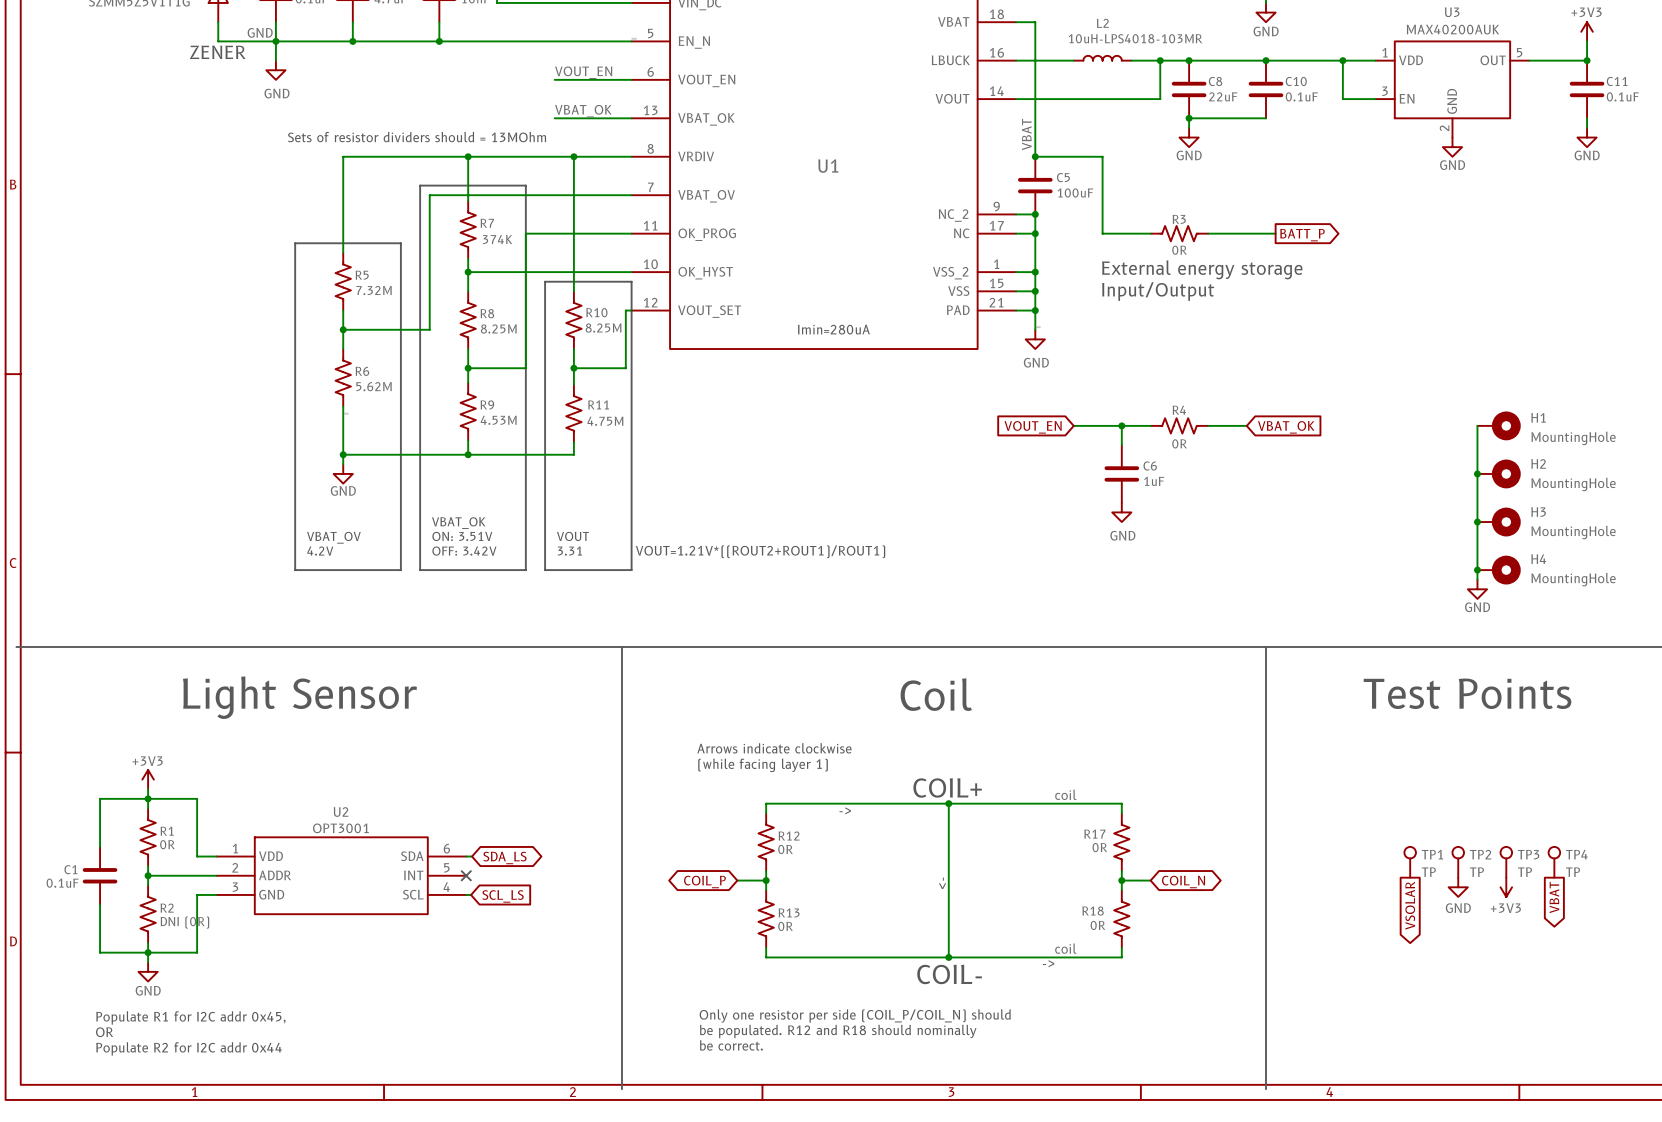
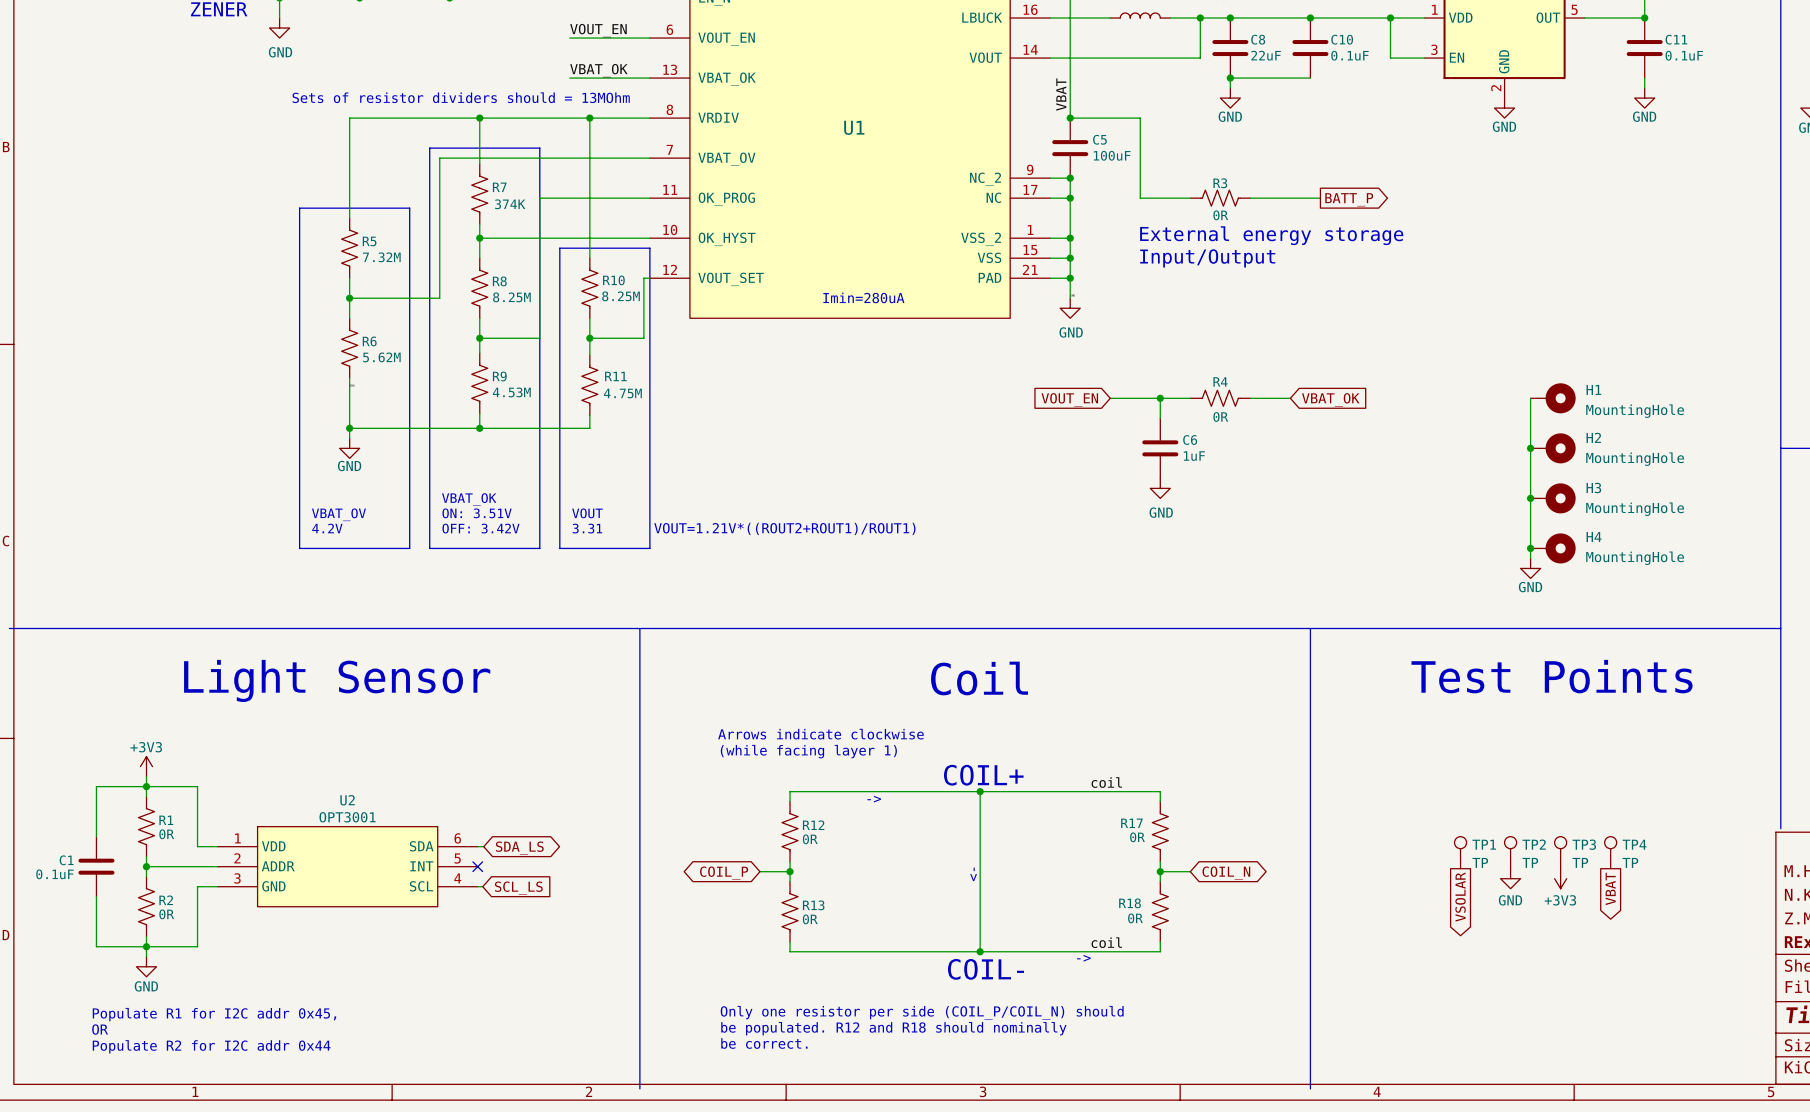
R2 value: DNI (0R) (184, 922) -> 0R (166, 914)

